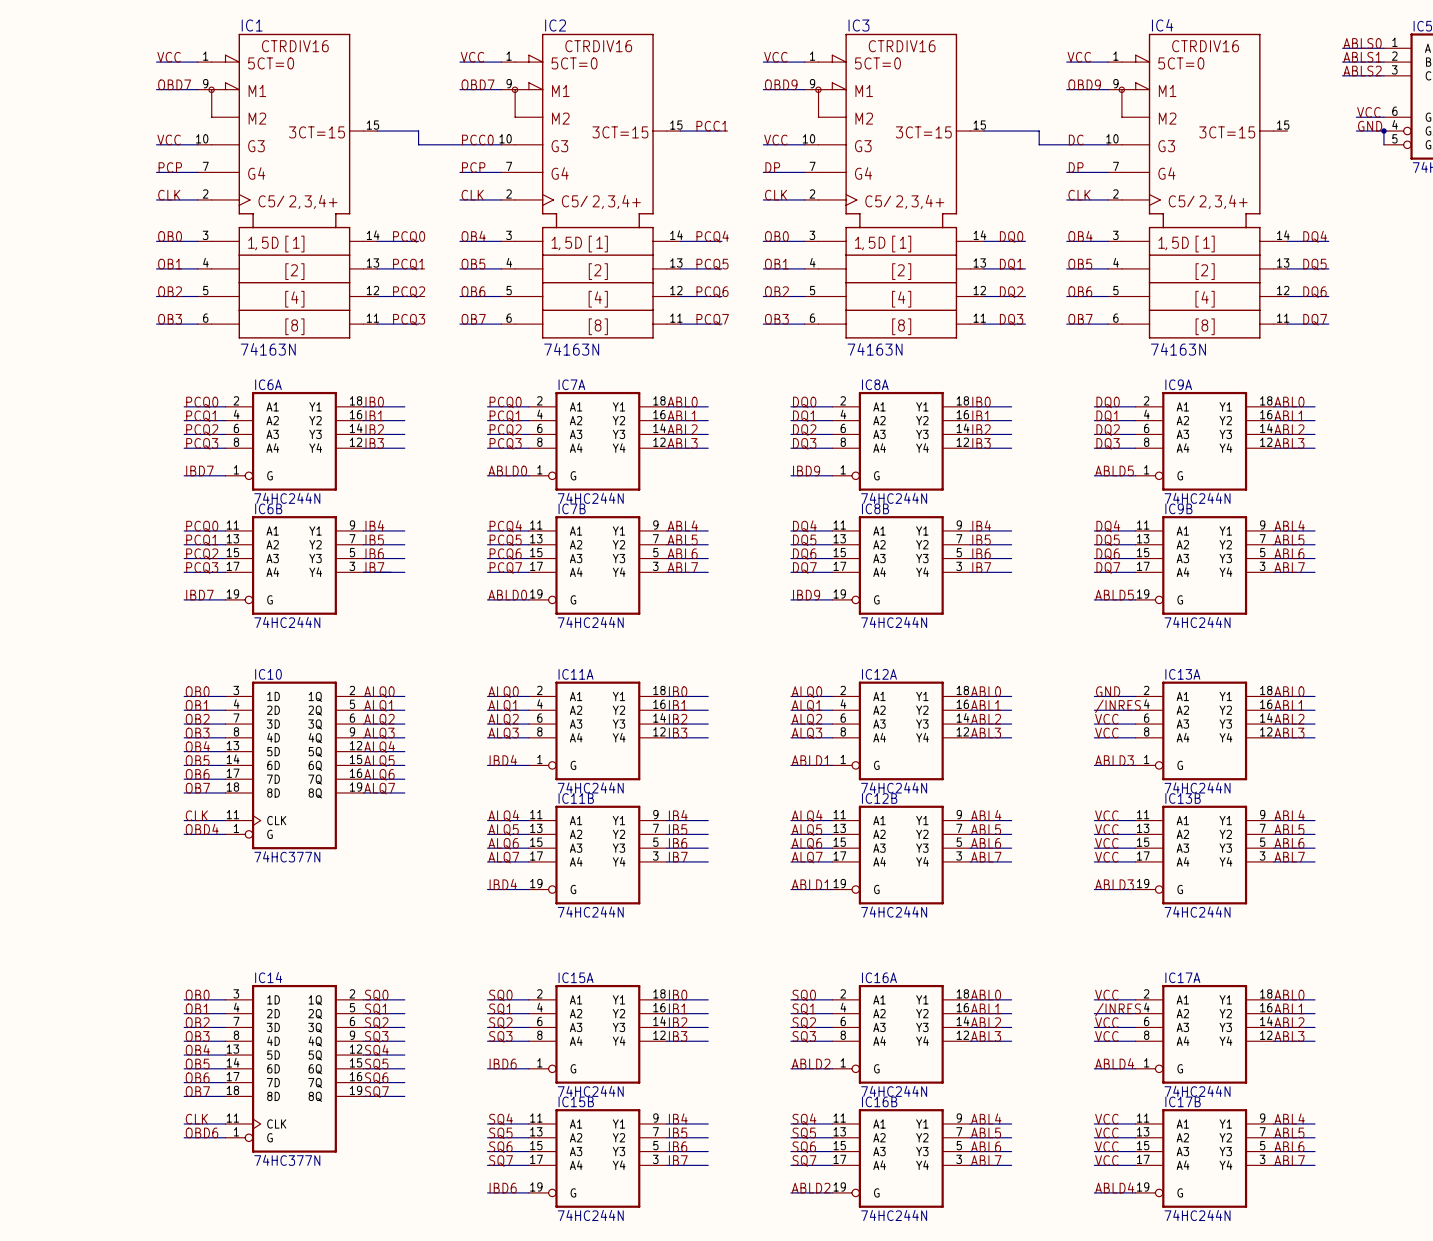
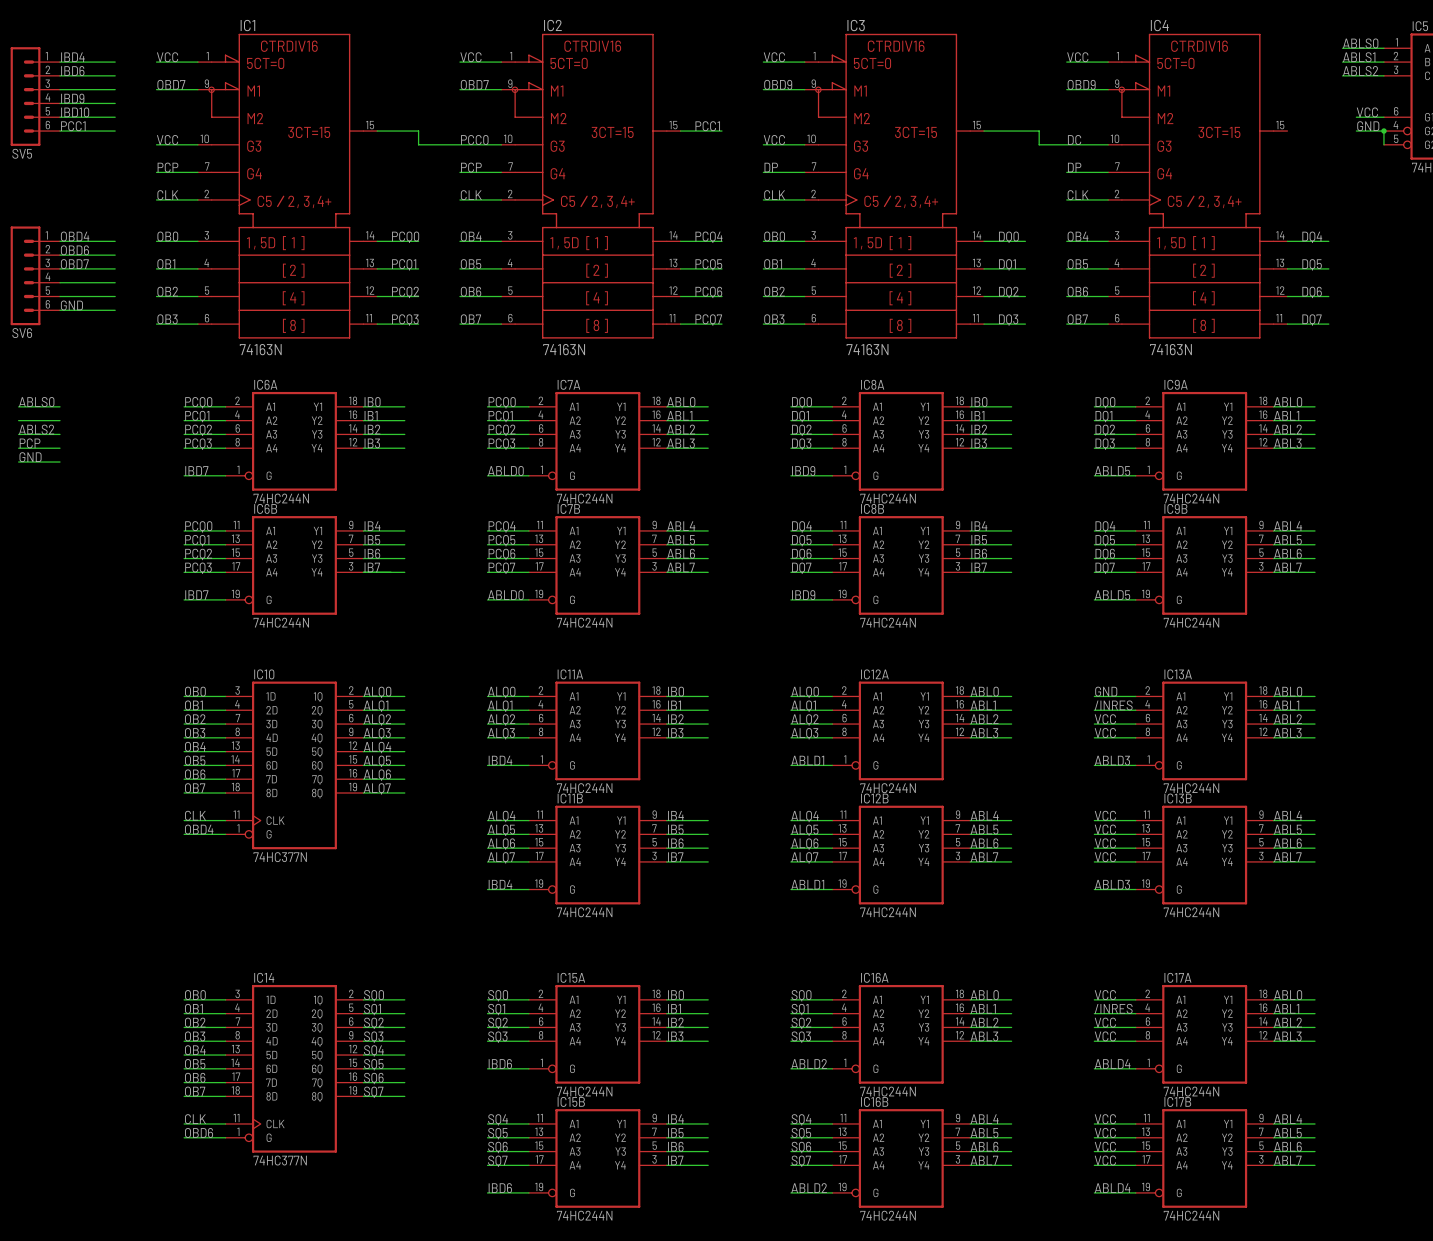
label: none -> IBD4 (72, 57)
wire: none -> (60, 62) (115, 62)
label: none -> IBD6 (72, 71)
wire: none -> (60, 75) (115, 75)
wire: none -> (60, 89) (115, 89)
SV5: none -> (35, 96)
label: none -> IBD9 (72, 98)
wire: none -> (60, 103) (115, 103)
label: none -> IBD10 (75, 112)
wire: none -> (60, 117) (115, 117)
label: none -> PCC1 (73, 126)
wire: none -> (60, 131) (115, 131)
label: none -> OBD4 (75, 236)
wire: none -> (60, 241) (115, 241)
label: none -> OBD6 (74, 250)
wire: none -> (60, 255) (115, 255)
label: none -> OBD7 (74, 264)
wire: none -> (60, 268) (115, 268)
SV6: none -> (35, 275)
wire: none -> (60, 282) (115, 282)
wire: none -> (60, 296) (115, 296)
label: none -> GND (71, 305)
wire: none -> (60, 310) (115, 310)
label: none -> ABLS0 (36, 402)
wire: none -> (18, 406) (60, 406)
wire: none -> (18, 420) (60, 420)
label: none -> ABLS2 (36, 429)
wire: none -> (18, 434) (60, 434)
label: none -> PCP (30, 443)
wire: none -> (18, 448) (60, 448)
label: none -> GND (30, 457)
wire: none -> (18, 462) (60, 462)

